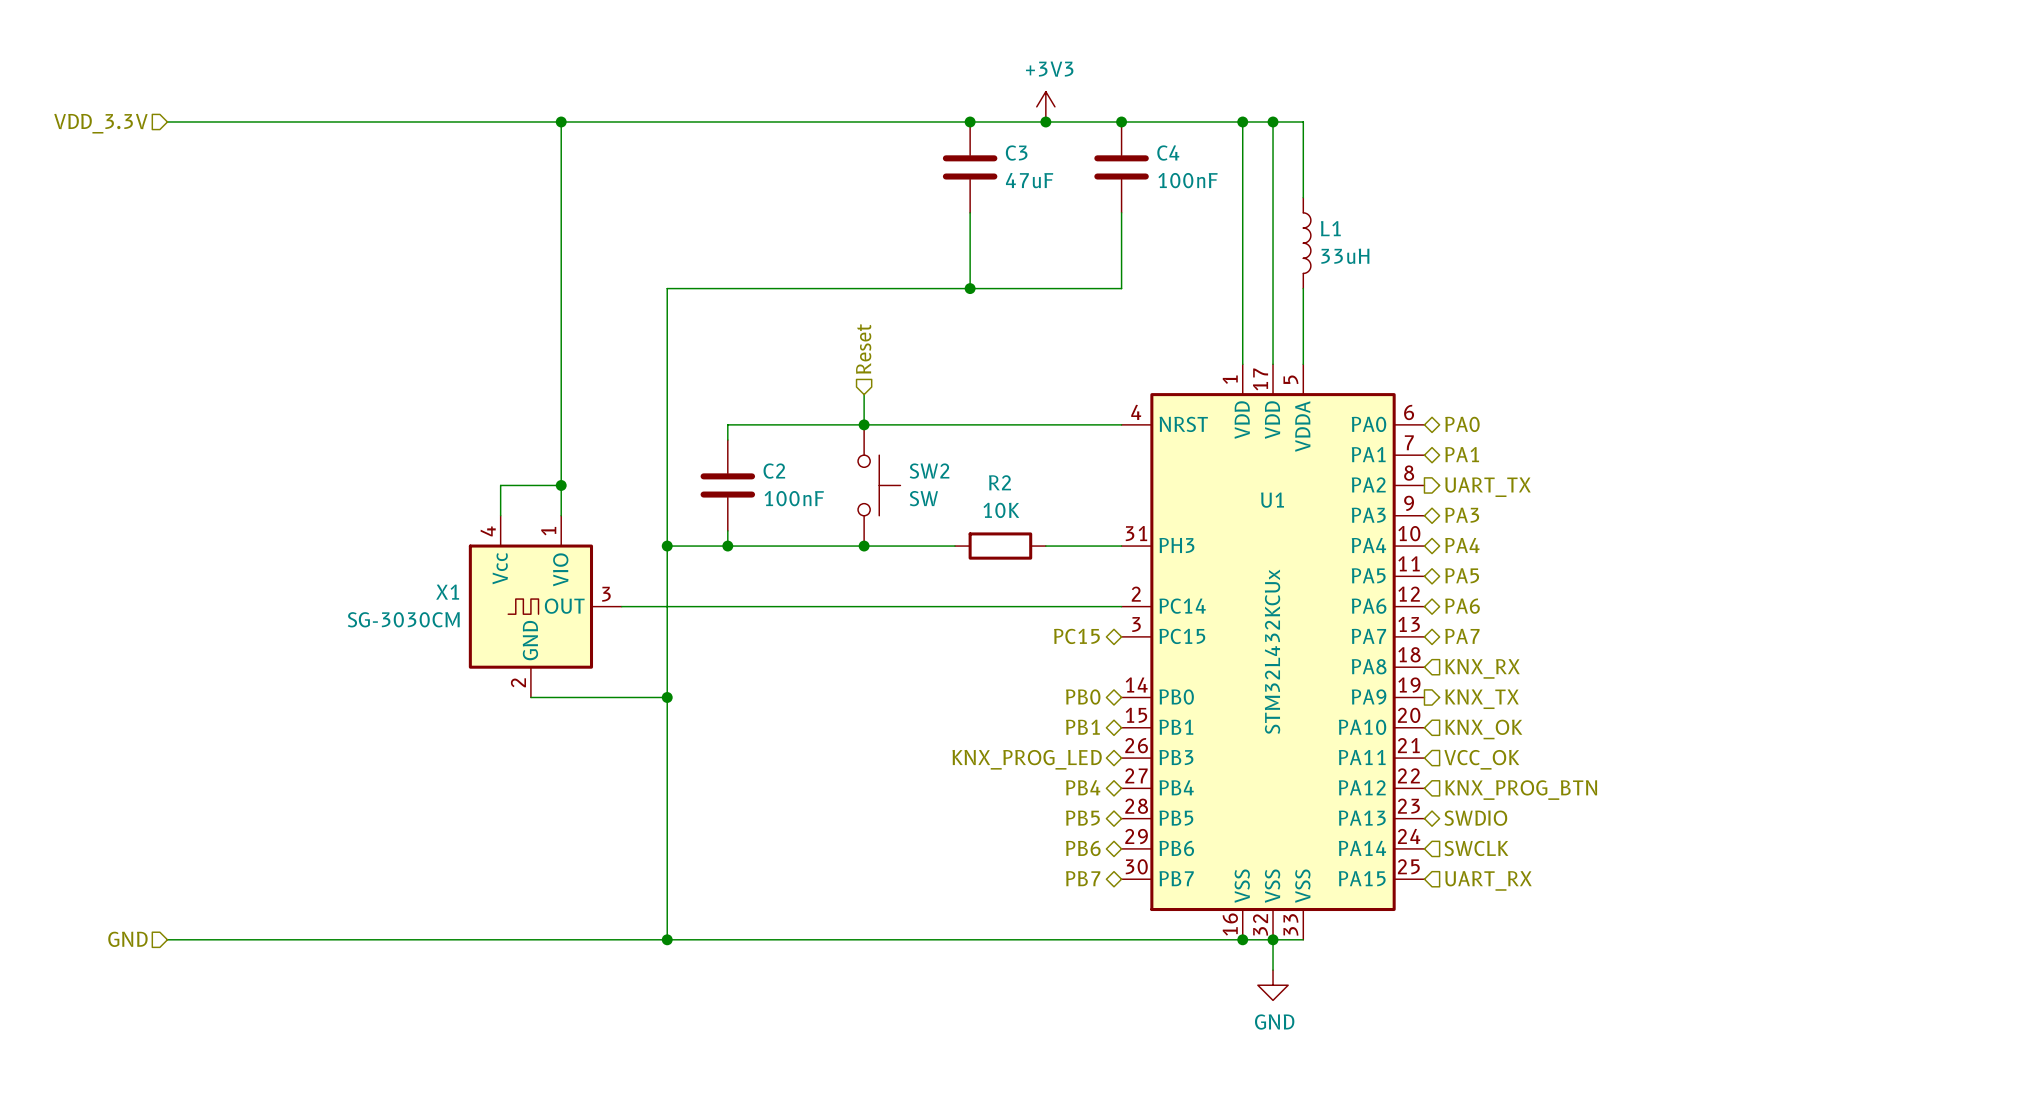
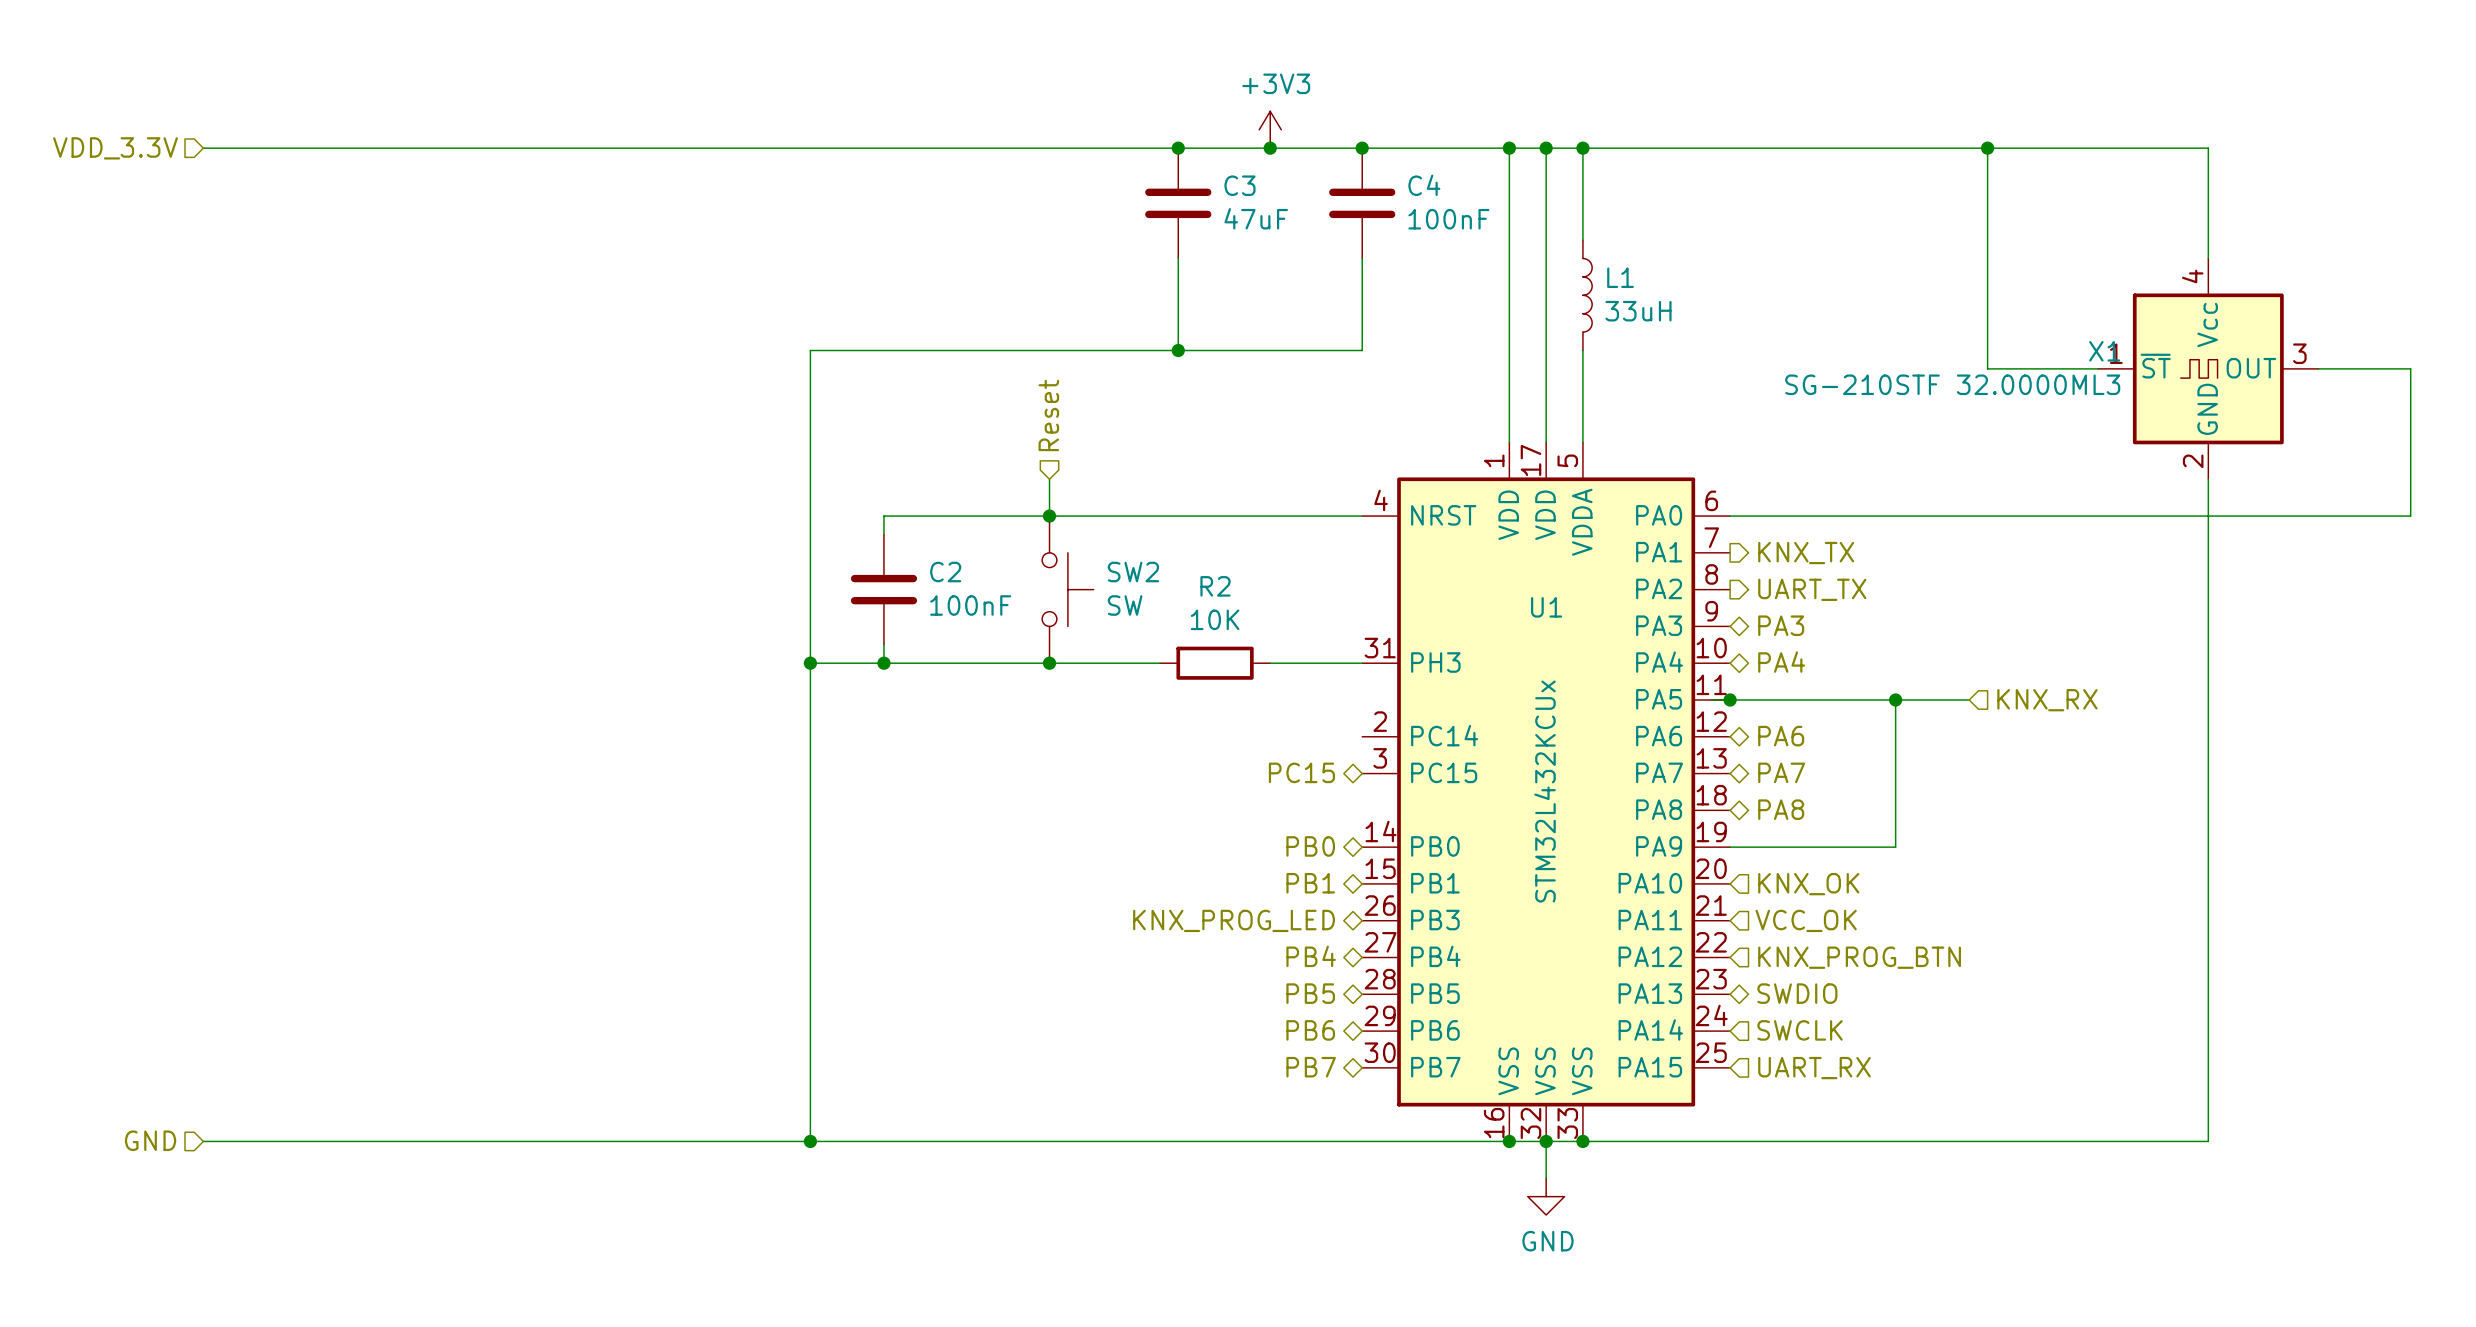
wire: (561, 121) (561, 515) -> none
junction: (561, 121) -> none
wire: none -> (1582, 148) (2208, 148) (2208, 258)
junction: none -> (1582, 148)
wire: none -> (1987, 148) (1987, 368) (2097, 368)
junction: none -> (1987, 148)
wire: none -> (2318, 368) (2410, 368) (2410, 516) (1730, 516)
wire: none -> (2208, 479) (2208, 1141) (1582, 1141)
hierarchical label: PA0 (1462, 424) -> none
hierarchical label shape: bidirectional (1462, 454) -> output (1806, 553)
hierarchical label: PA1 (1462, 454) -> KNX_TX (1806, 553)
wire: (561, 485) (500, 485) (500, 515) -> none
junction: (561, 485) -> none
X1 symbol: [468, 515, 622, 698] -> [2097, 258, 2319, 480]
hierarchical label: PA5 (1462, 575) -> none
wire: none -> (1711, 699) (1969, 699)
junction: none -> (1730, 699)
wire: none -> (1895, 699) (1895, 847) (1730, 847)
junction: none -> (1895, 699)
hierarchical label: none -> KNX_RX (2047, 700)
wire: (621, 606) (1121, 606) -> none
X1 value: SG-3030CM (403, 619) -> SG-210STF 32.0000ML3 (1952, 384)
hierarchical label shape: input (1482, 668) -> bidirectional (1781, 809)
hierarchical label: KNX_RX (1482, 668) -> PA8 (1781, 809)
wire: (530, 697) (667, 697) -> none
junction: (667, 697) -> none
hierarchical label: KNX_TX (1482, 699) -> none
junction: none -> (1582, 1141)

